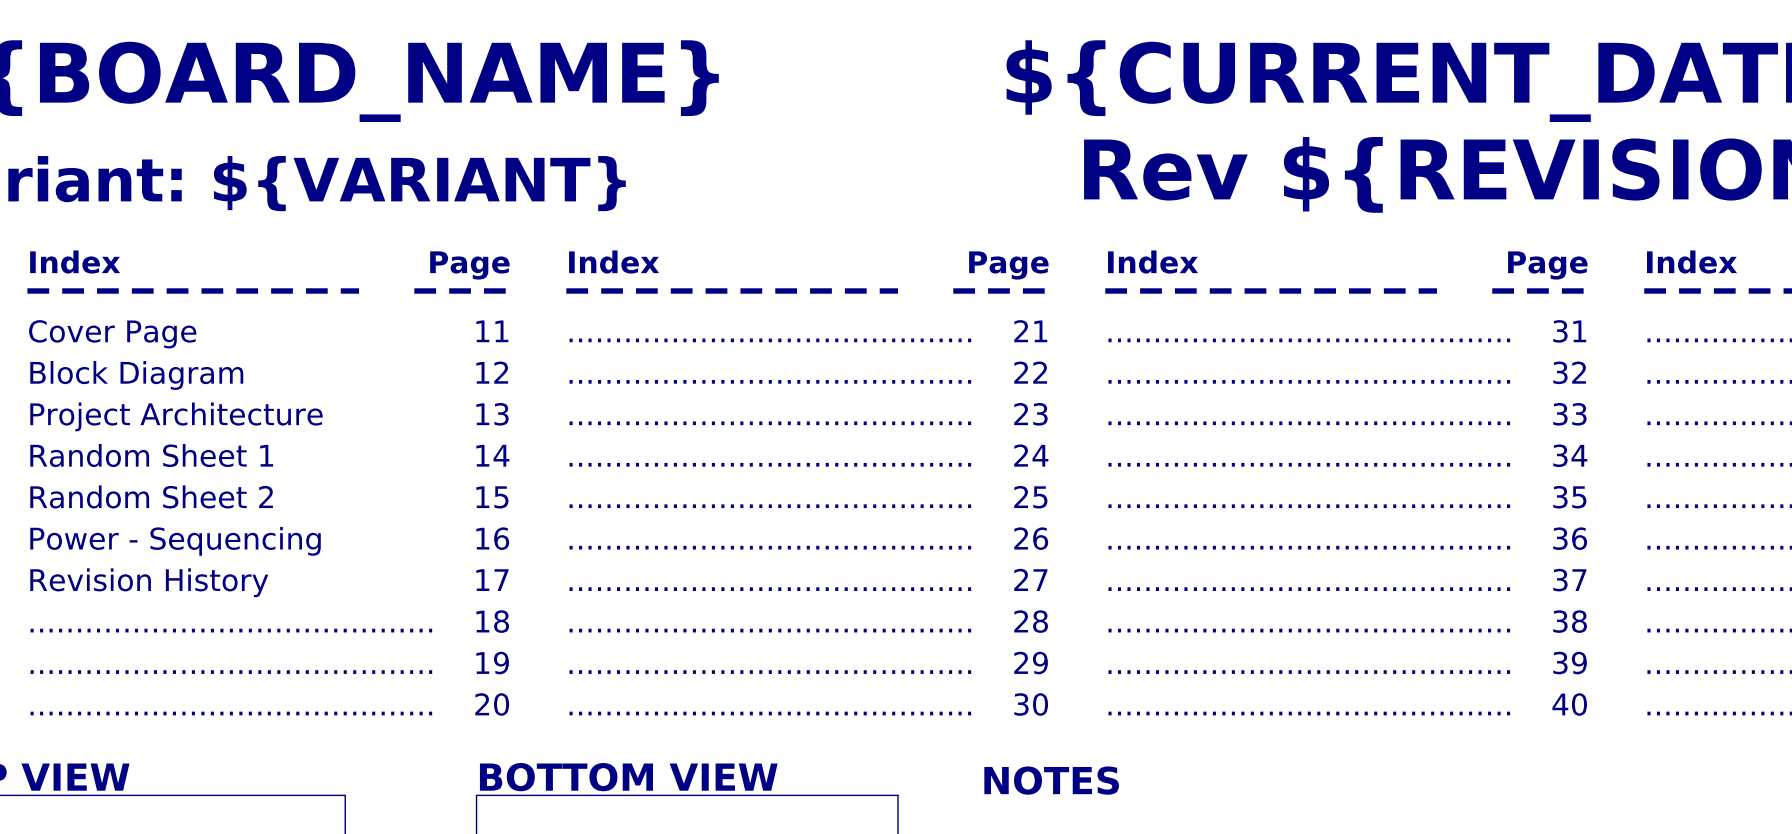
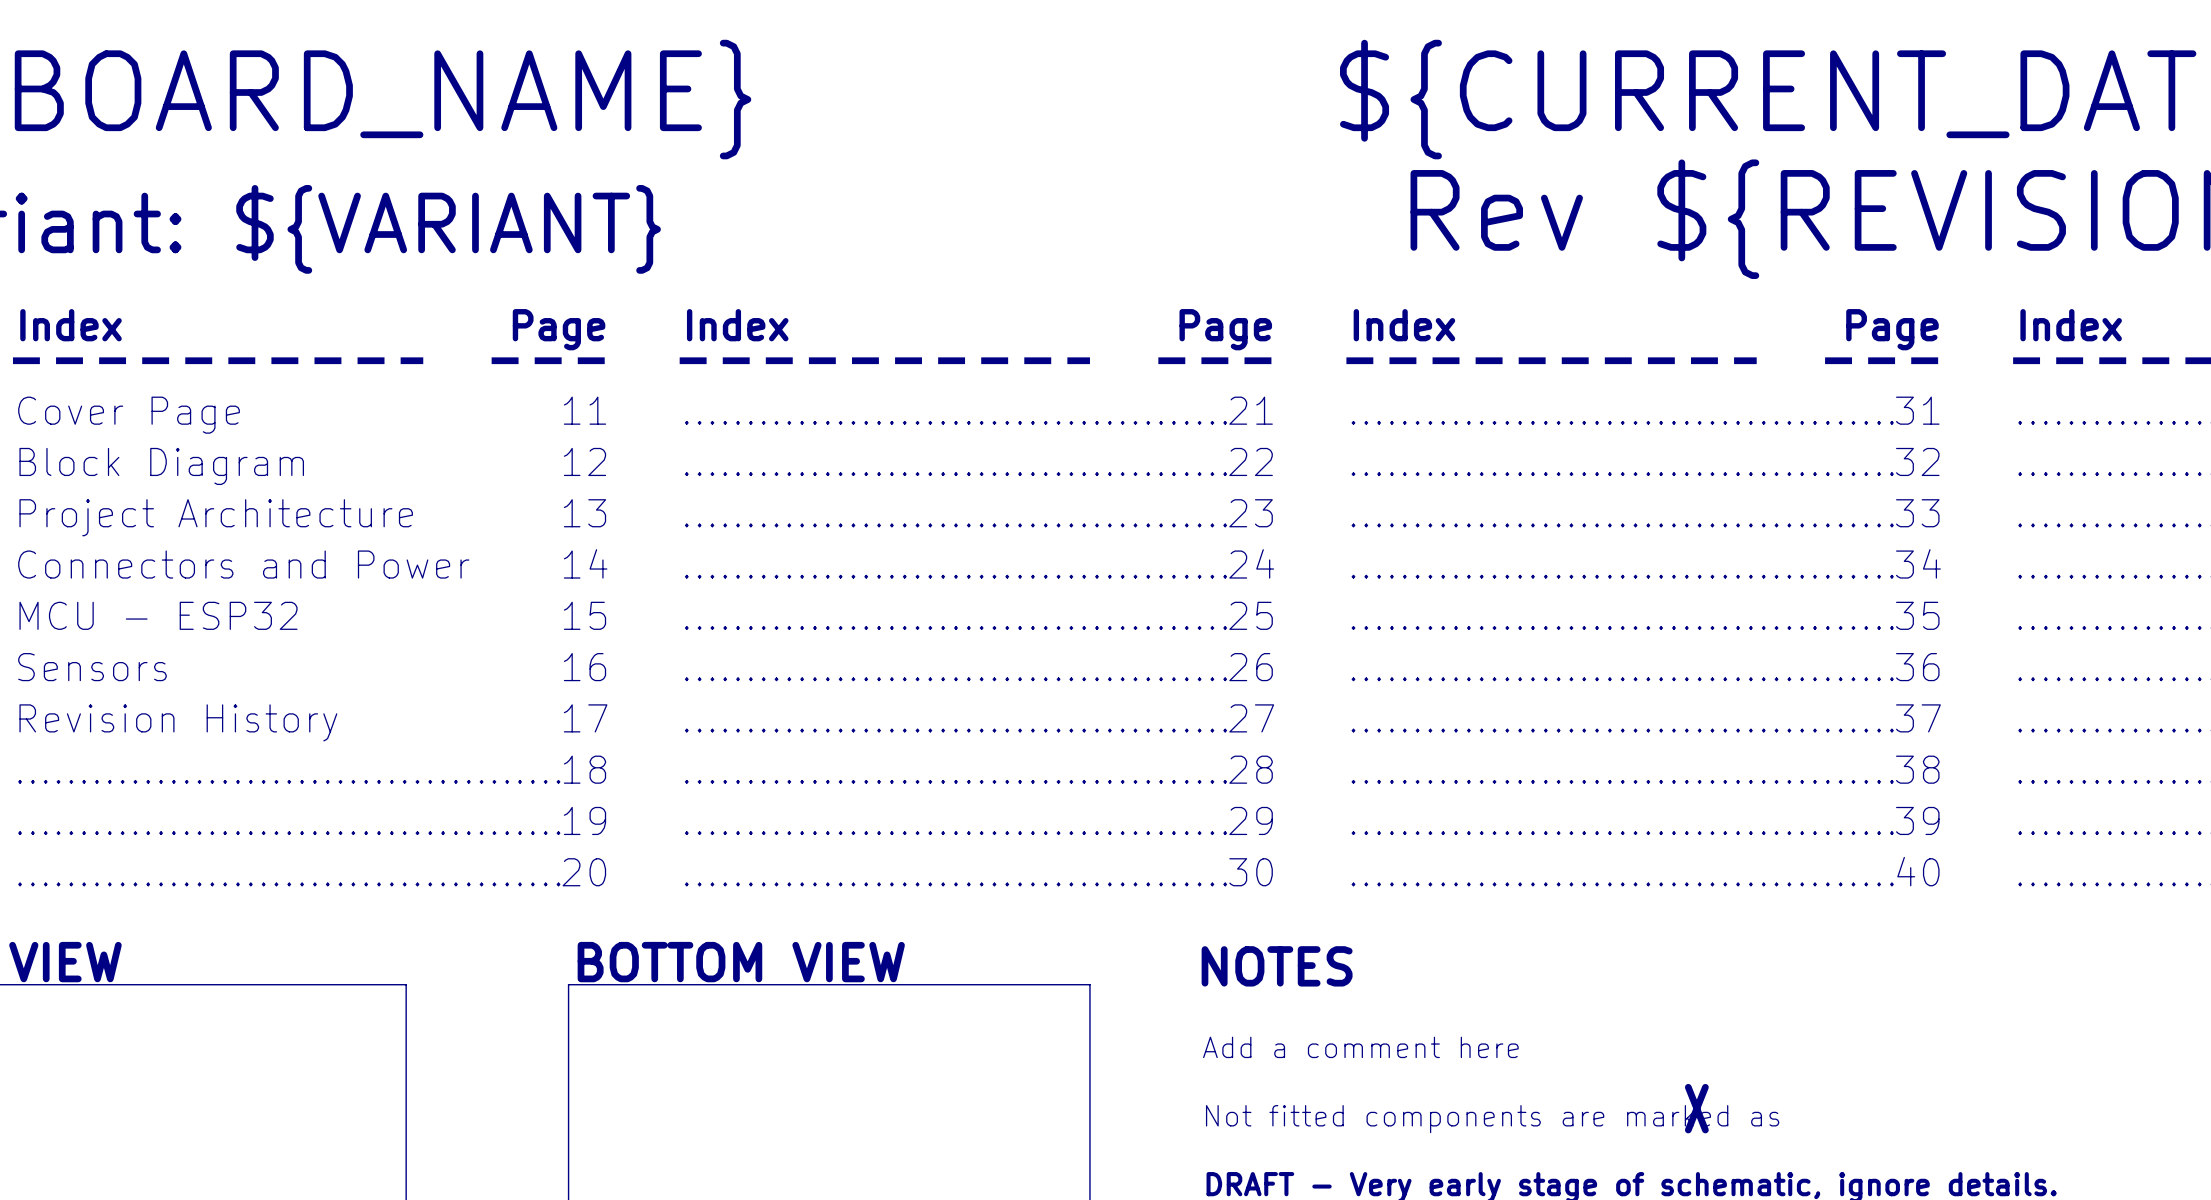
text: Random Sheet 1 (151, 455) -> Connectors and Power (243, 564)
text: Random Sheet 2 (151, 496) -> MCU - ESP32 (158, 615)
text: Power - Sequencing (175, 541) -> Sensors (92, 667)

